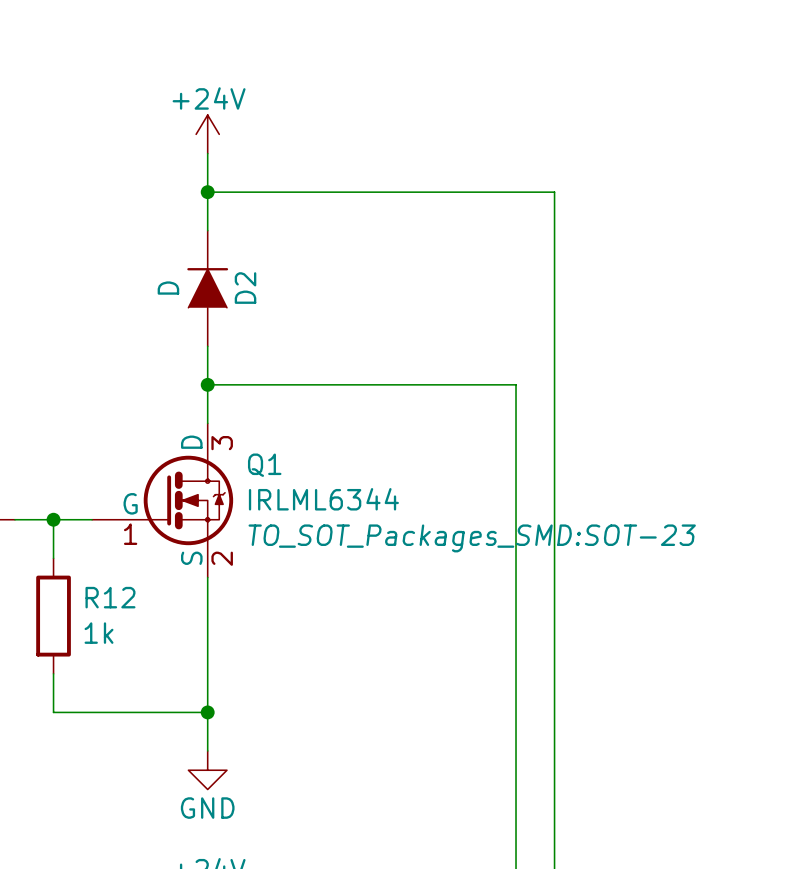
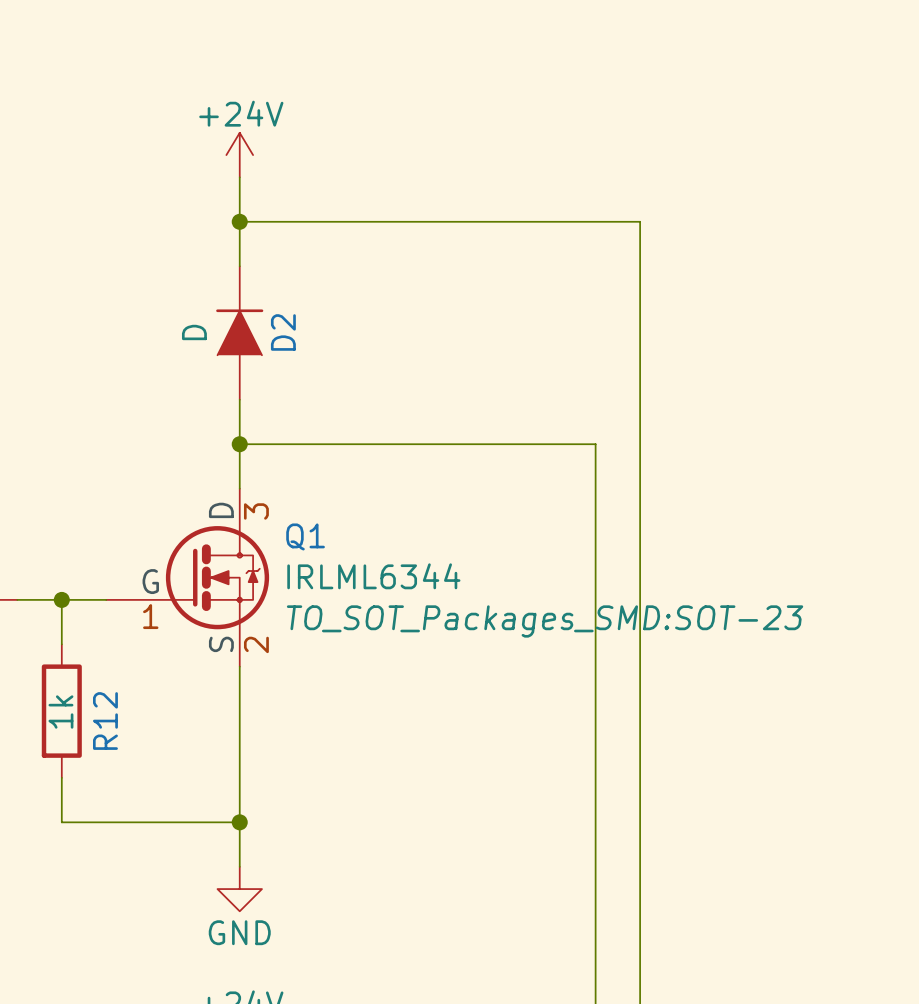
R12 name rotation: 0° (110, 597) -> 90° counterclockwise (105, 721)
R12 value rotation: 0° (99, 633) -> 90° counterclockwise (60, 712)
R12 value position: 1k (99, 633) -> 1k (60, 712)

